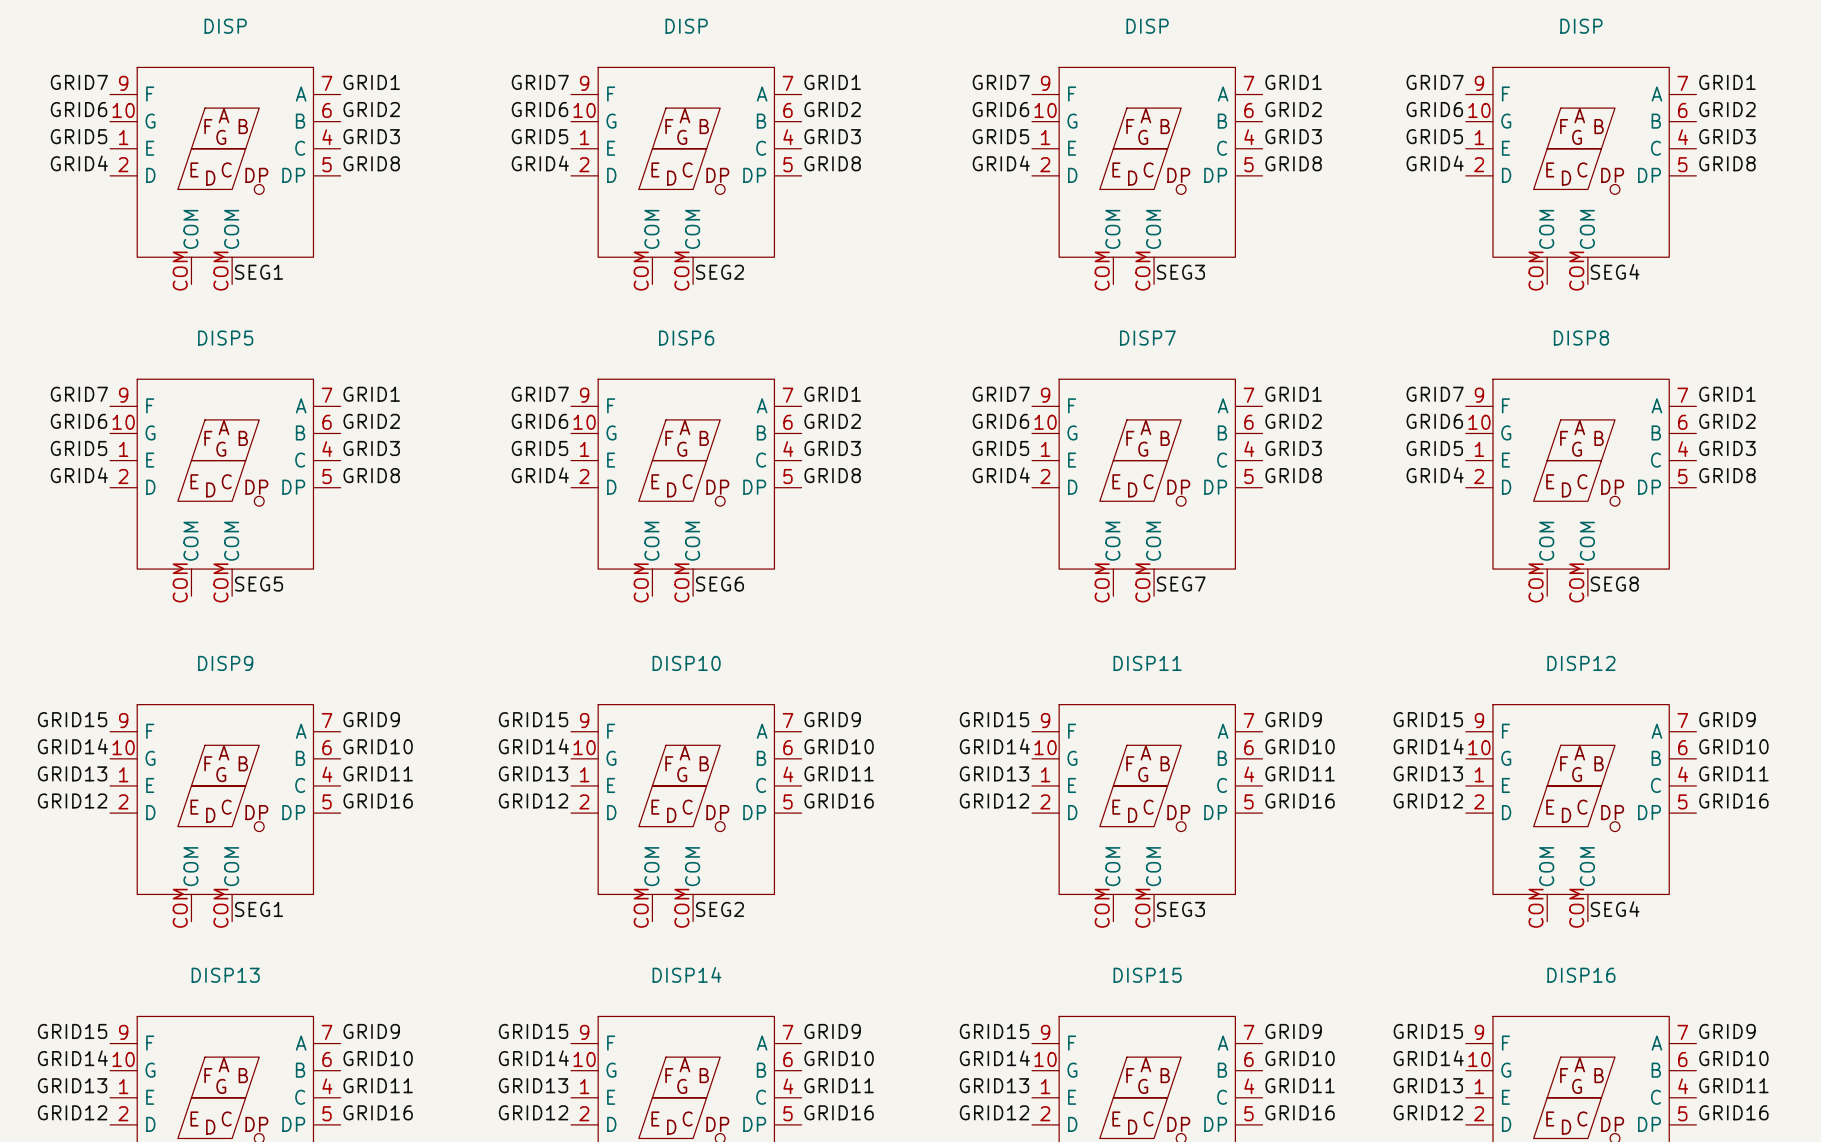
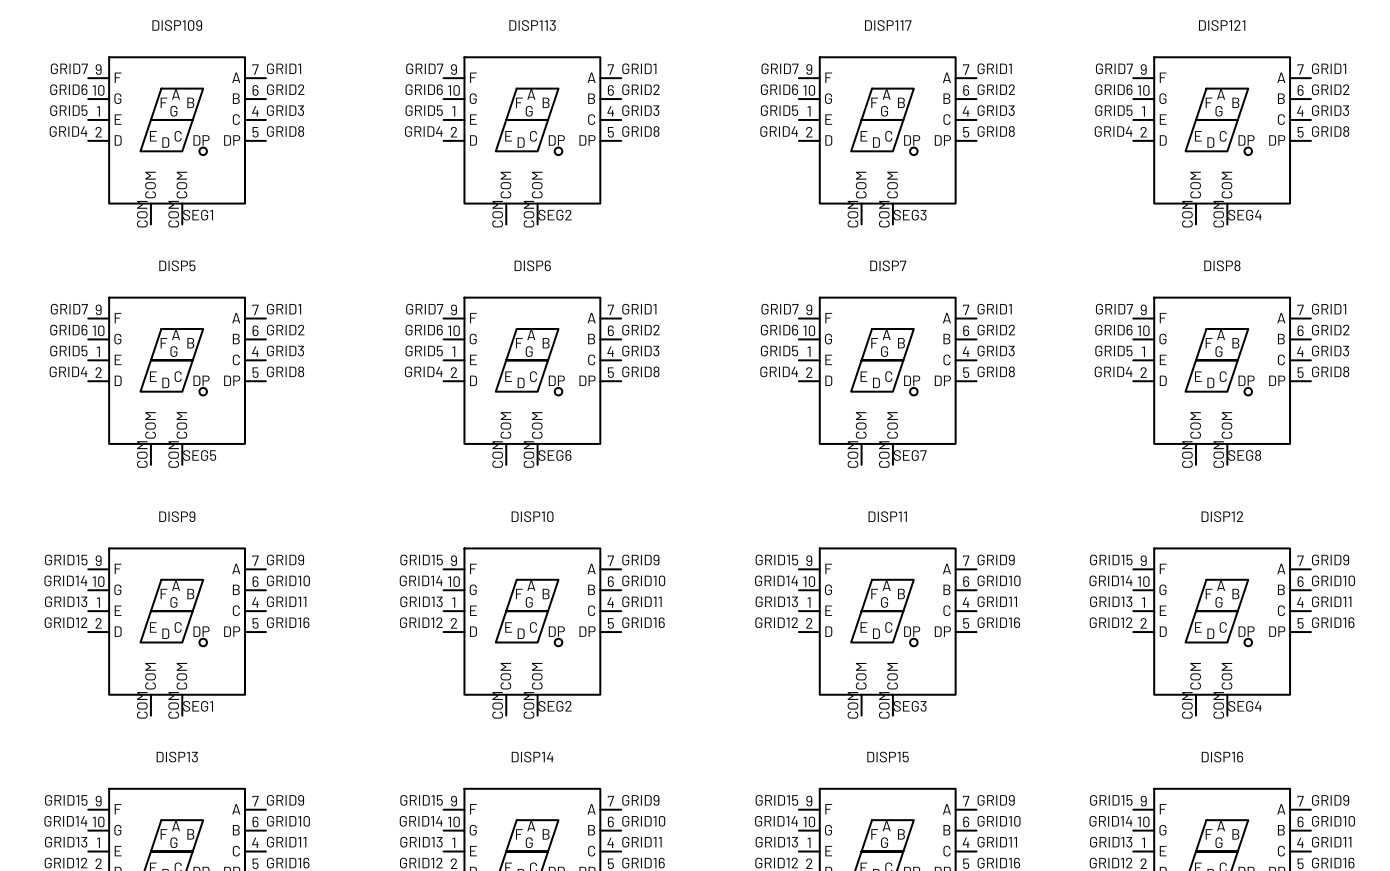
DISP name: DISP (225, 26) -> DISP109 (177, 25)
DISP name: DISP (686, 26) -> DISP113 (532, 25)
DISP name: DISP (1147, 26) -> DISP117 (888, 25)
DISP name: DISP (1581, 26) -> DISP121 (1222, 25)

